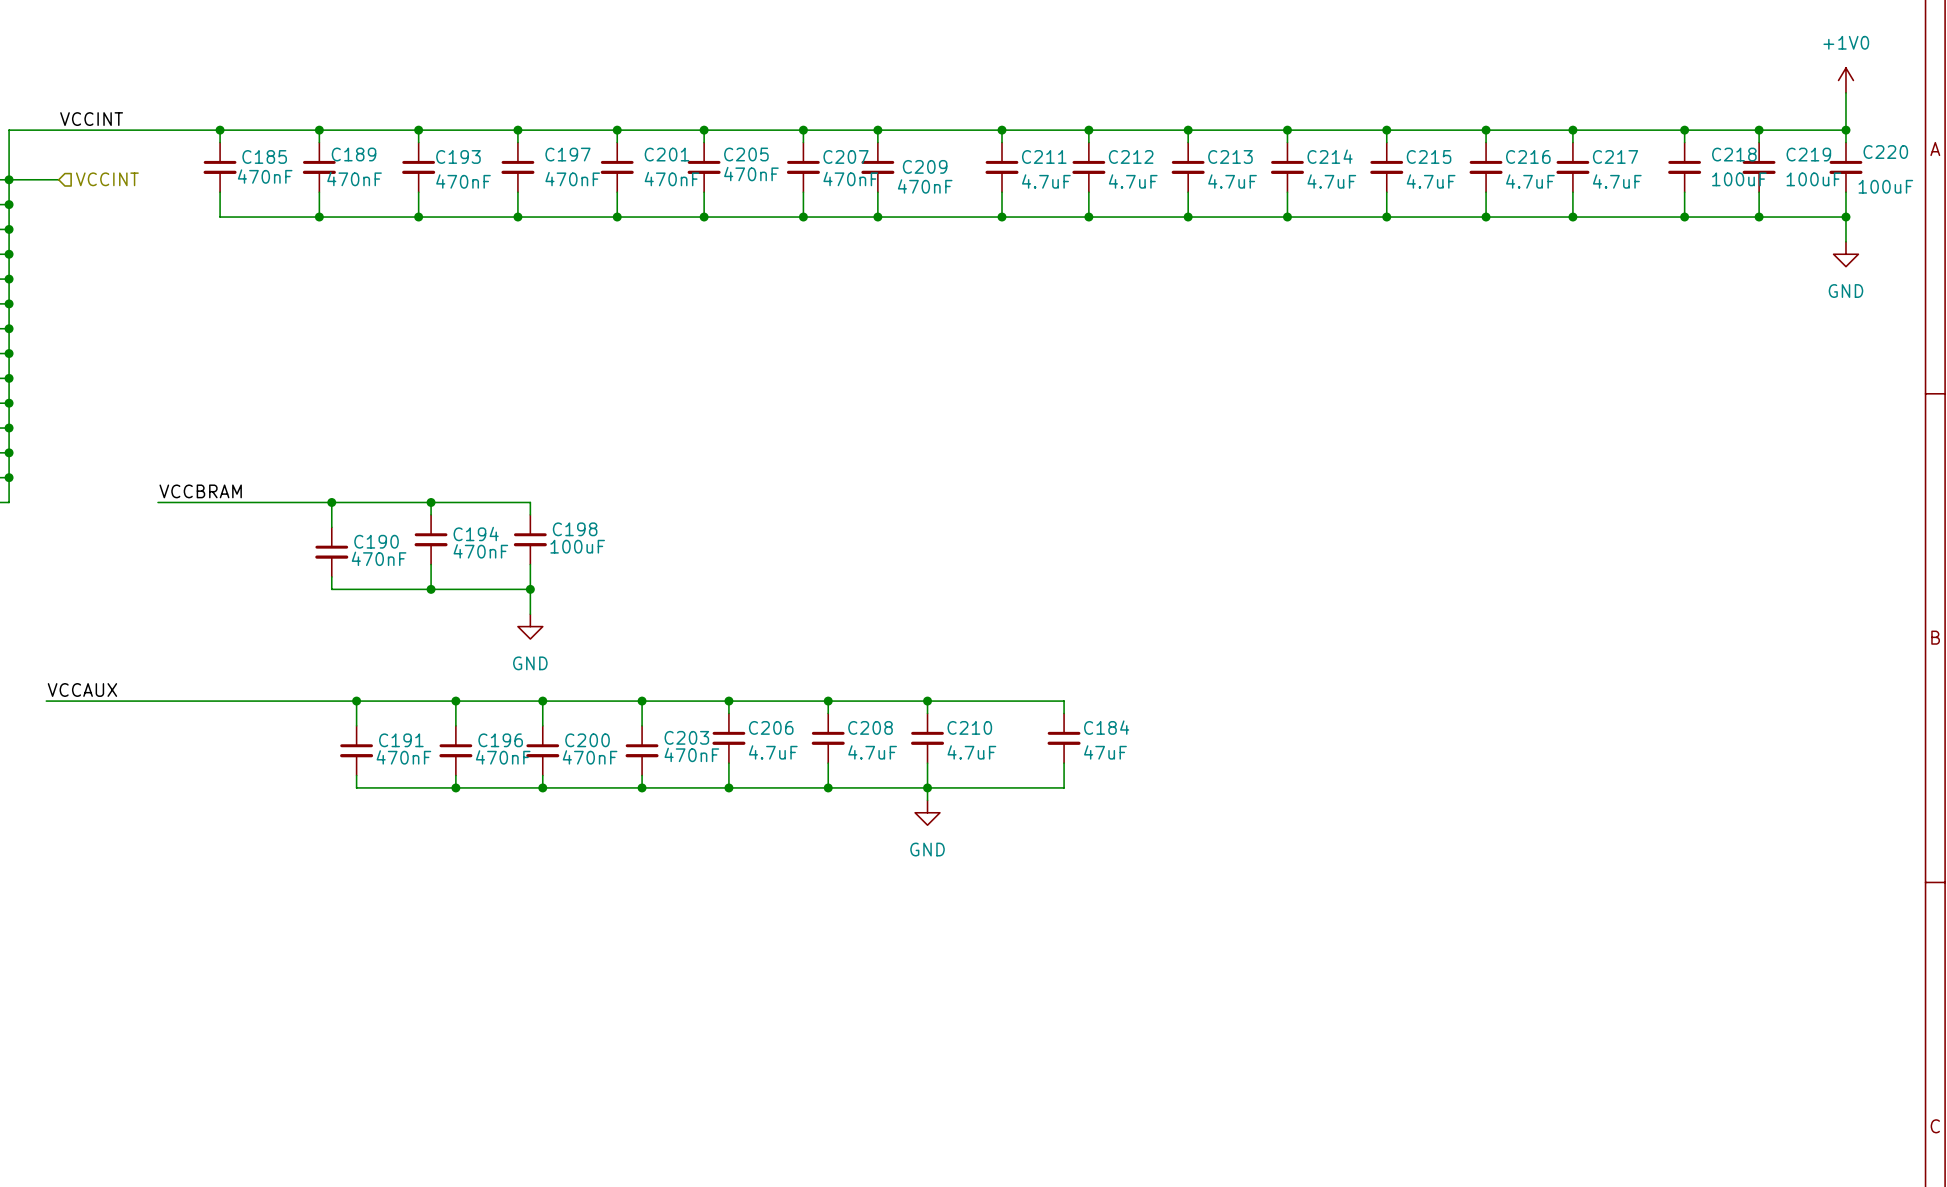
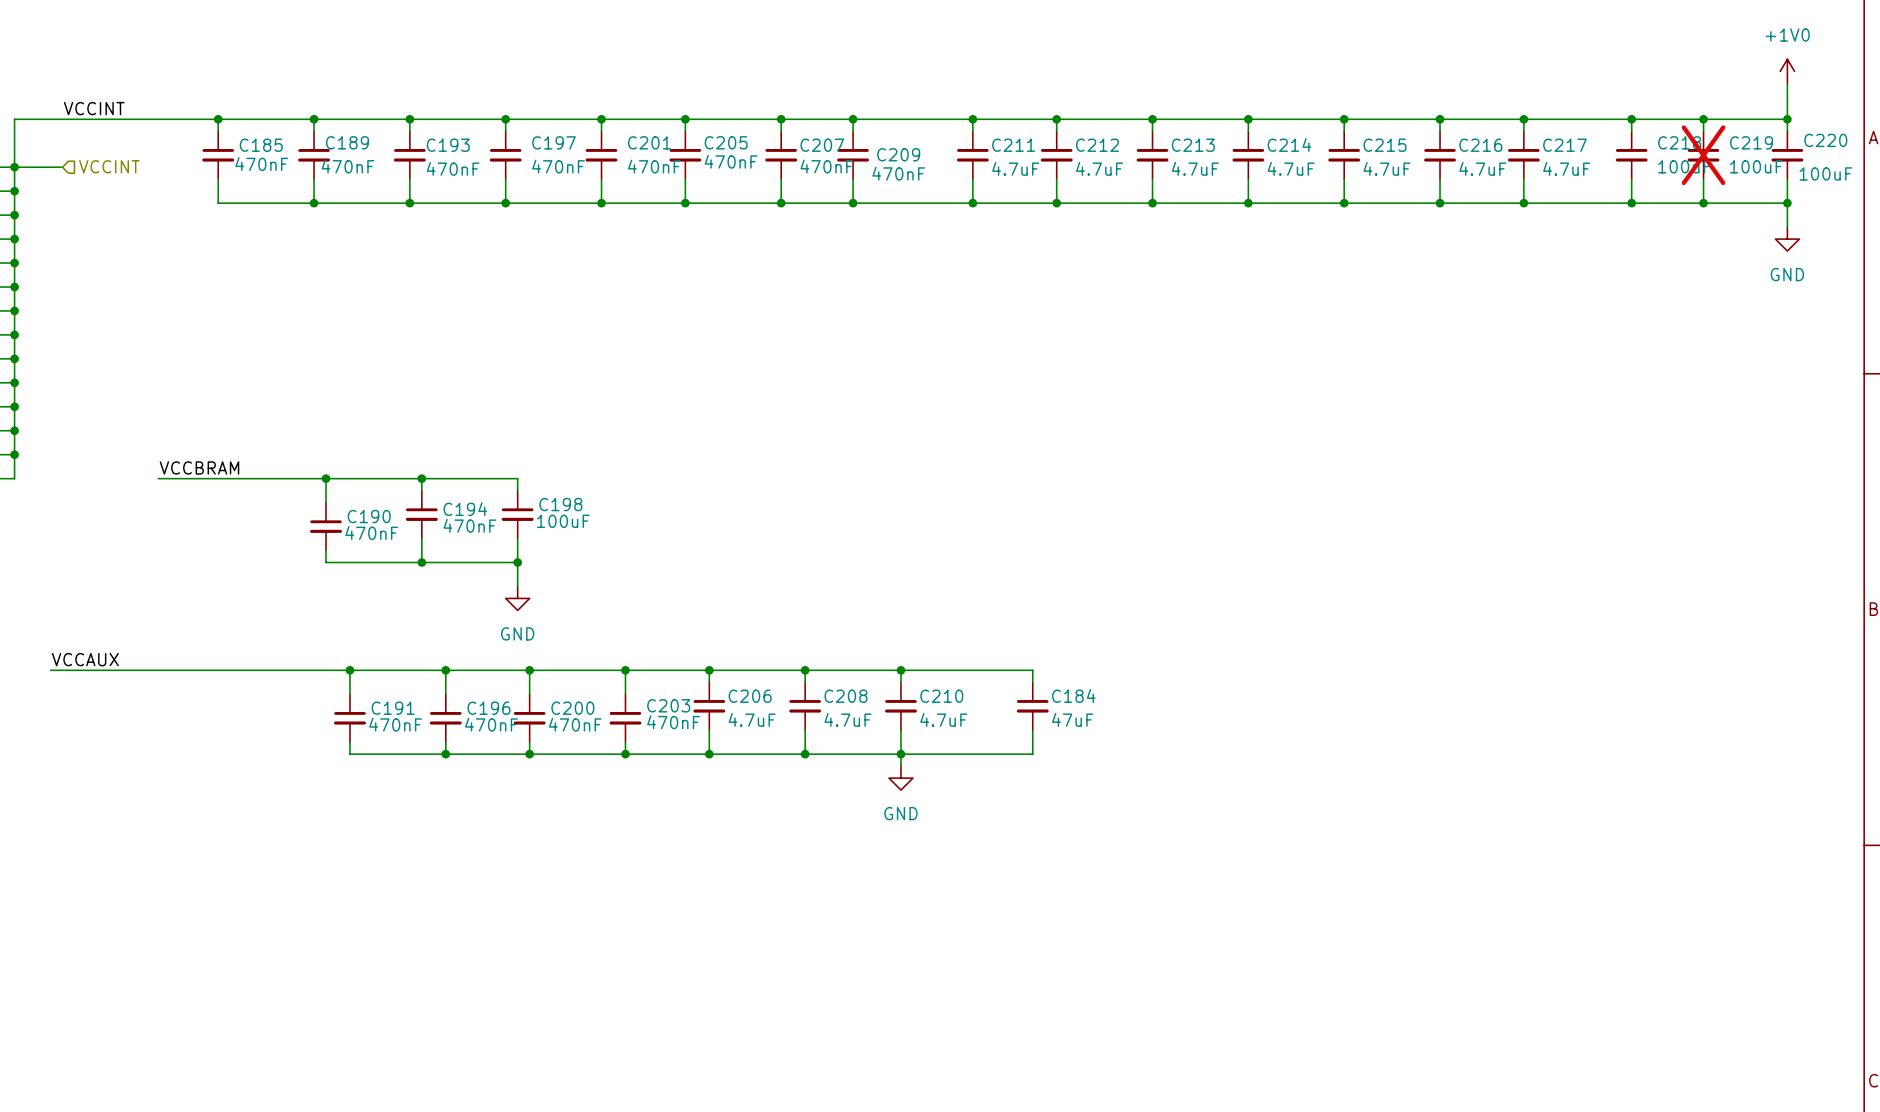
C219 do-not-place cross: none -> (1703, 155)

